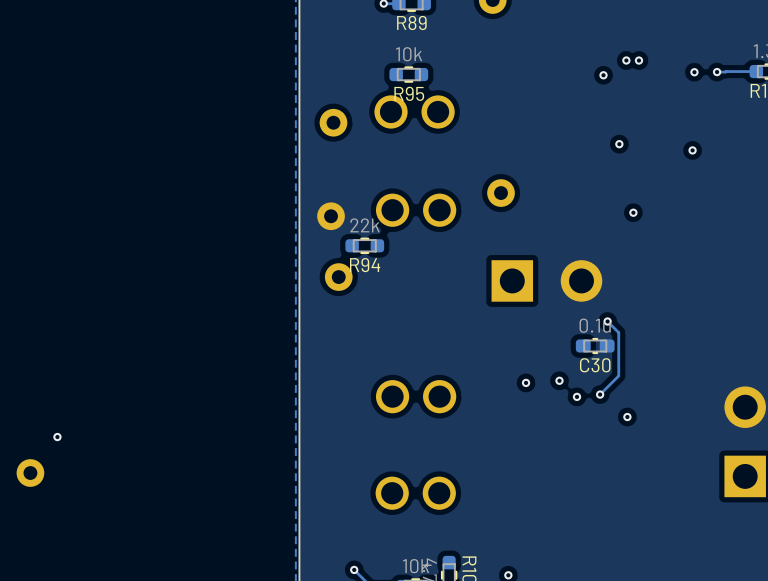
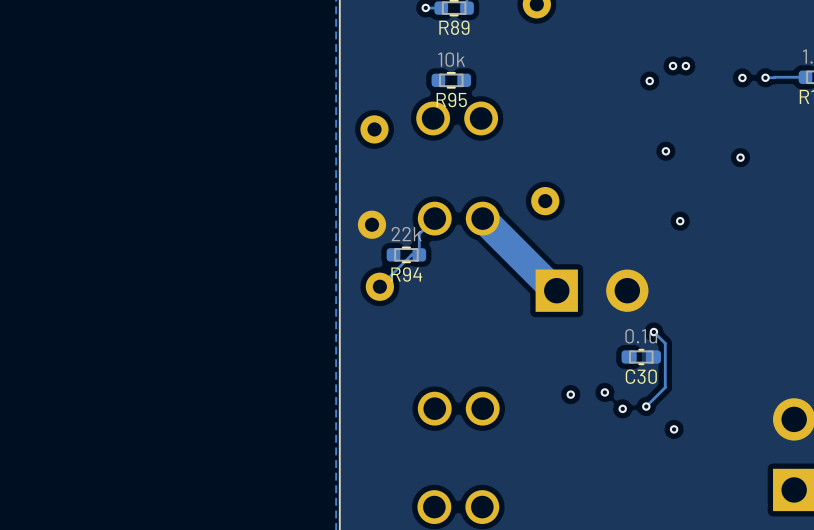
track: none -> (434, 218) (419, 234) (419, 254) (411, 254) (379, 286)
track: none -> (482, 218) (556, 290)
via: (57, 437) -> none
part: (30, 473) -> none

